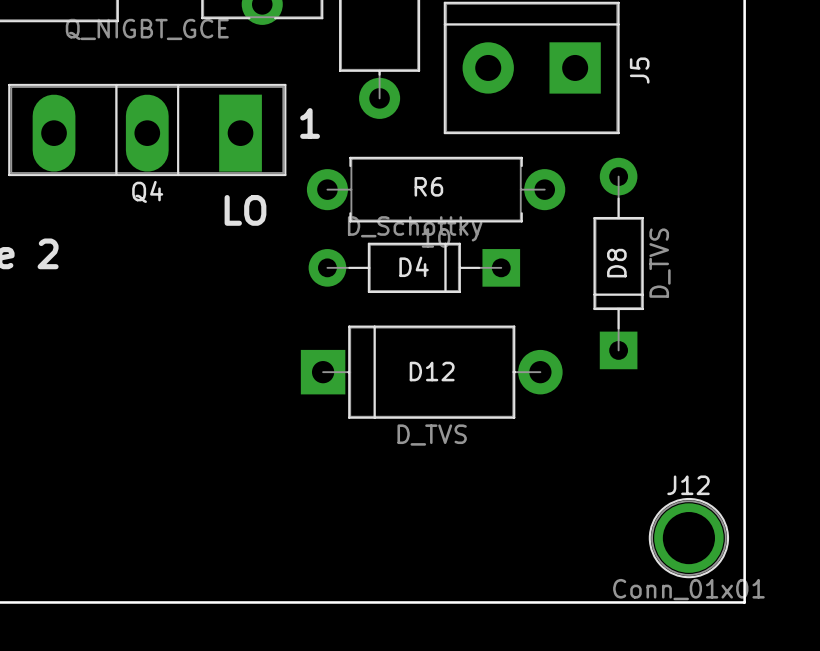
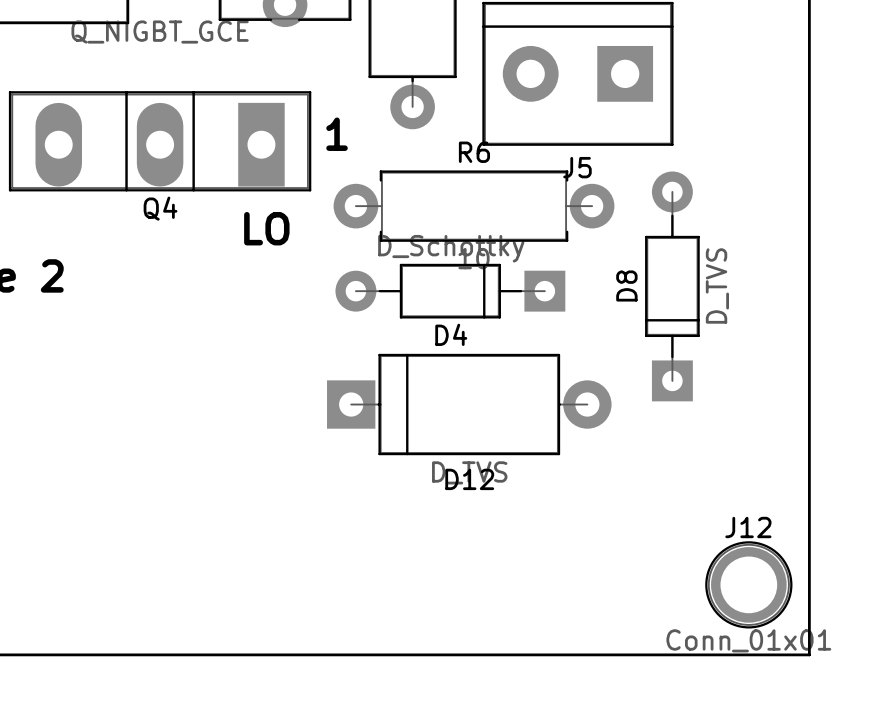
J5 name rotation: 0° (639, 70) -> 90° clockwise (577, 167)
J5 name position: J5 (639, 70) -> J5 (577, 167)
R6 name position: R6 (428, 186) -> R6 (474, 152)
D8 name position: D8 (616, 263) -> D8 (626, 285)
D4 name position: D4 (414, 266) -> D4 (451, 334)
D12 name position: D12 (432, 371) -> D12 (469, 479)

